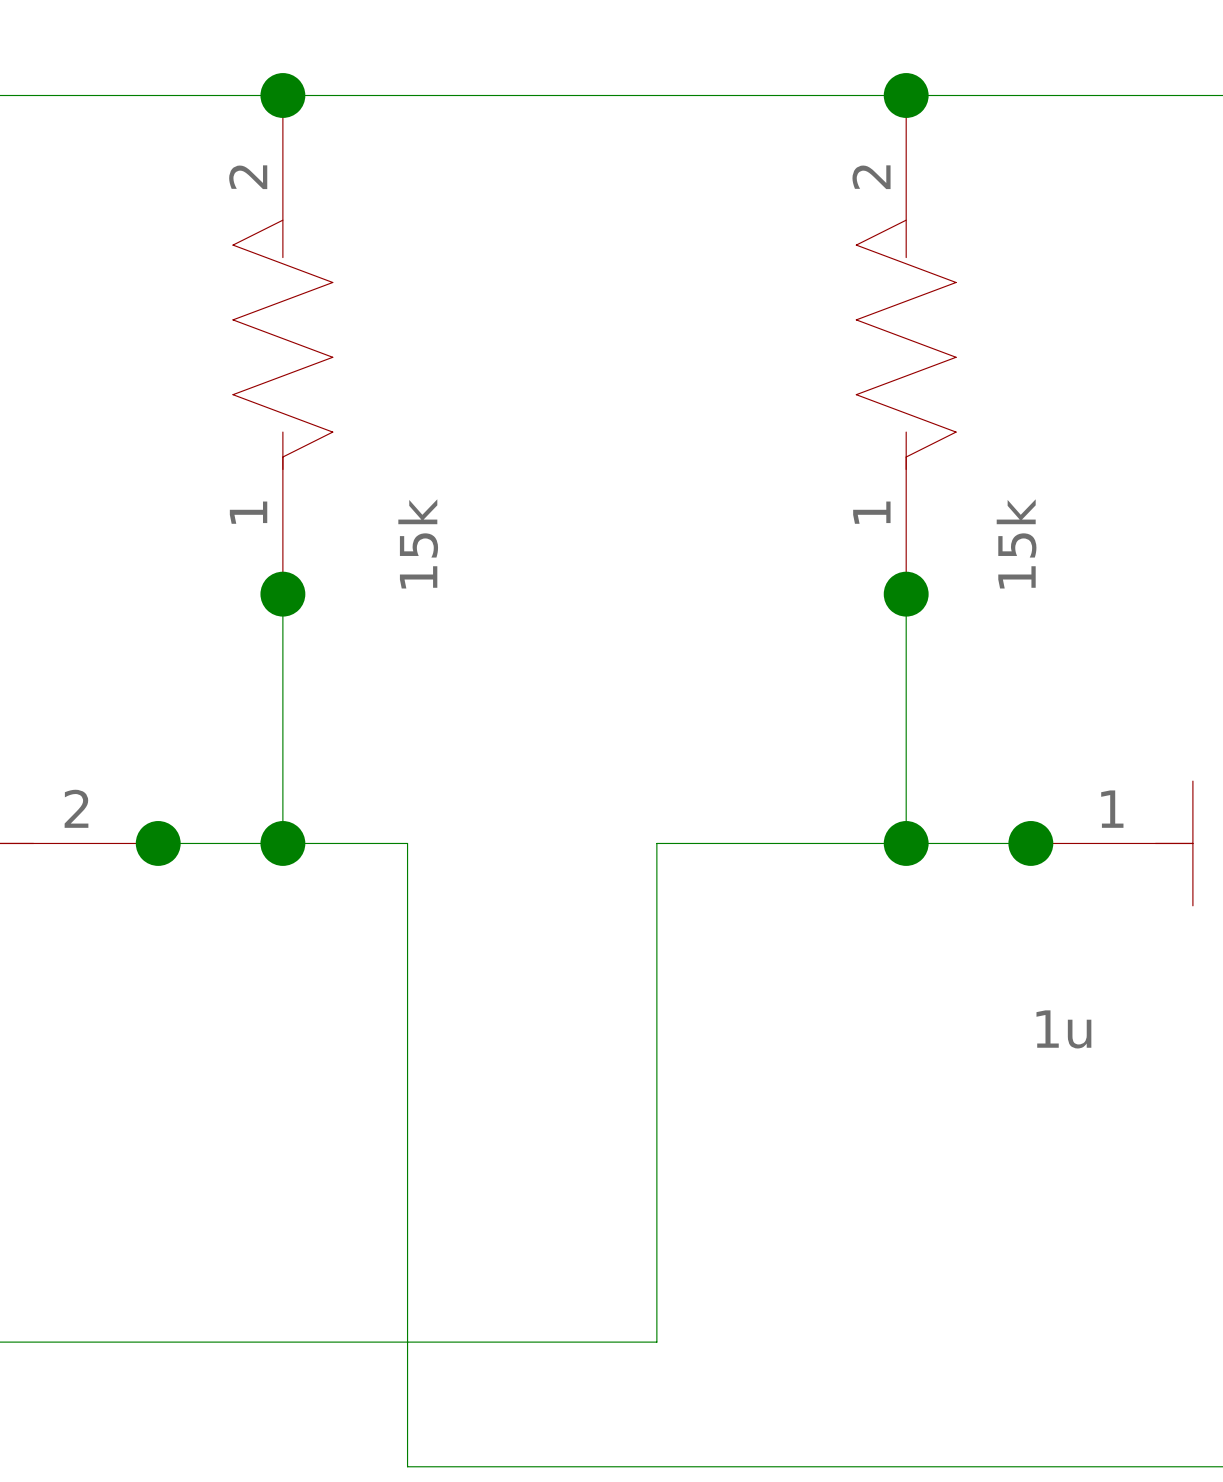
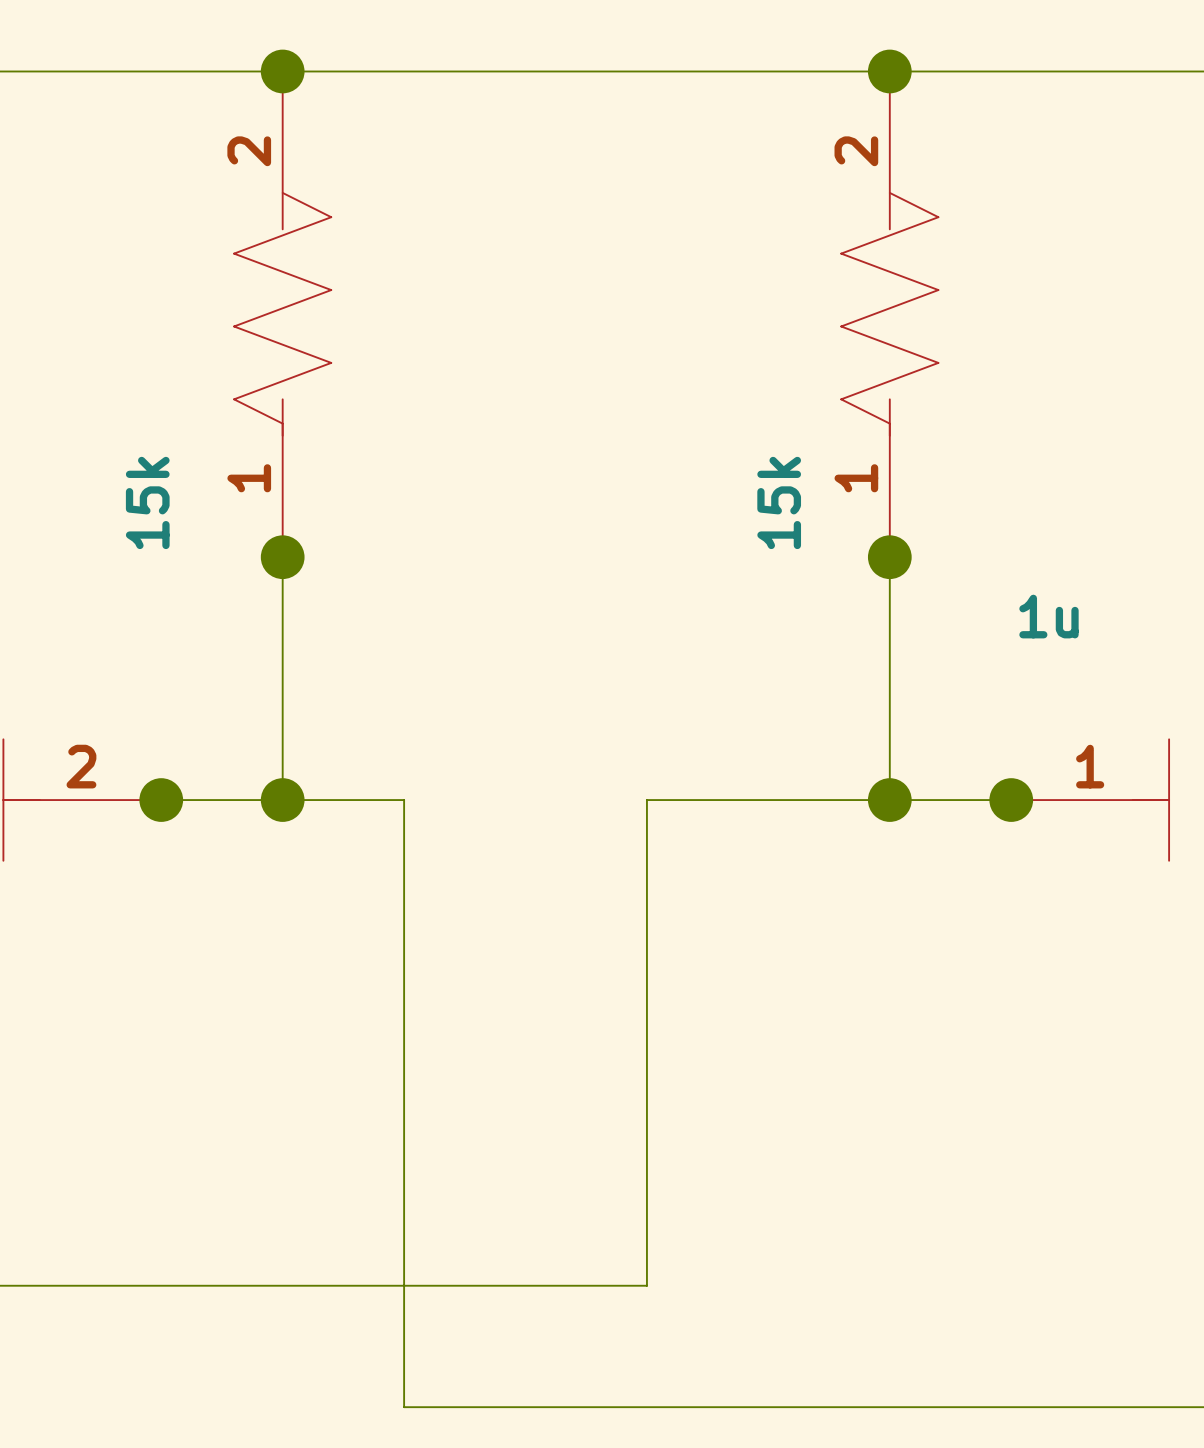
part flip: as is (282, 344) -> left-right (282, 314)
part flip: as is (906, 344) -> left-right (889, 314)
part value position: 1u (1063, 1029) -> 1u (1048, 616)

